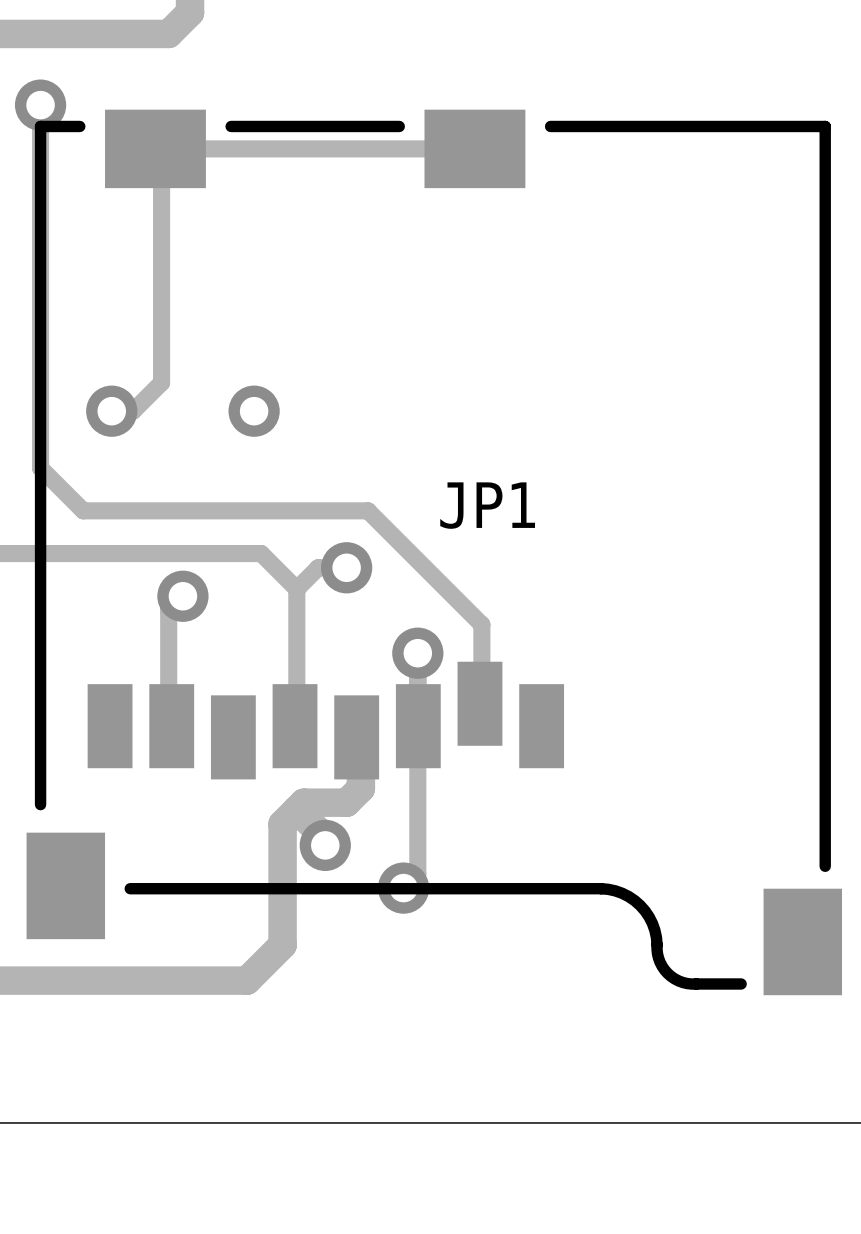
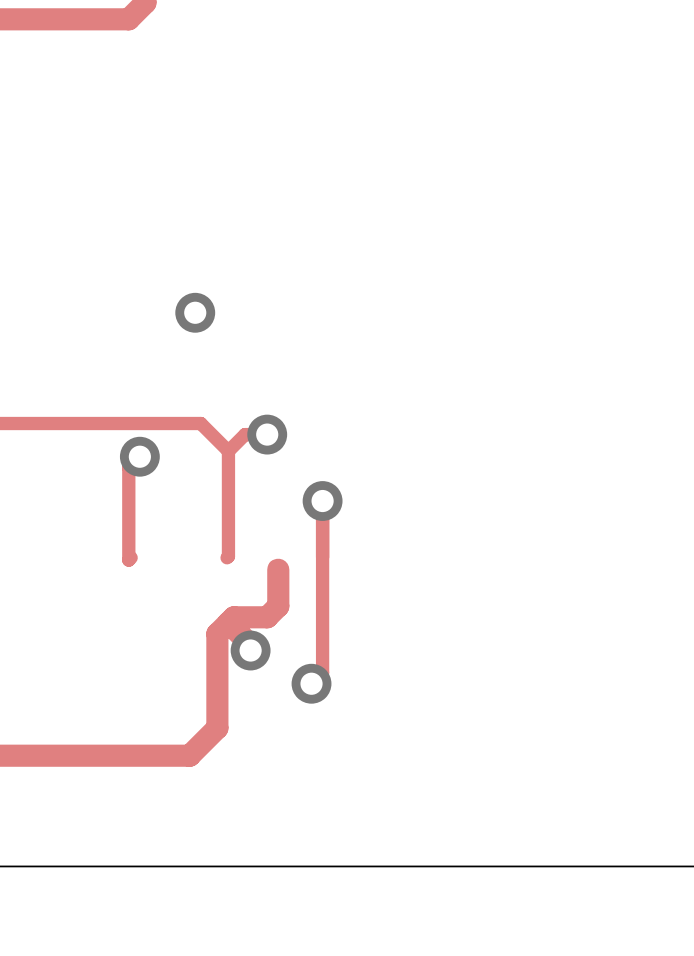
track: (40, 105) (40, 468) (83, 510) (367, 510) (481, 624) (481, 701) (479, 703) -> none
via: (40, 105) -> none
track: (155, 148) (474, 148) -> none
track: (182, 148) (161, 170) (161, 382) (133, 411) (111, 411) -> none
via: (111, 411) -> none
JP1: (434, 552) -> none

